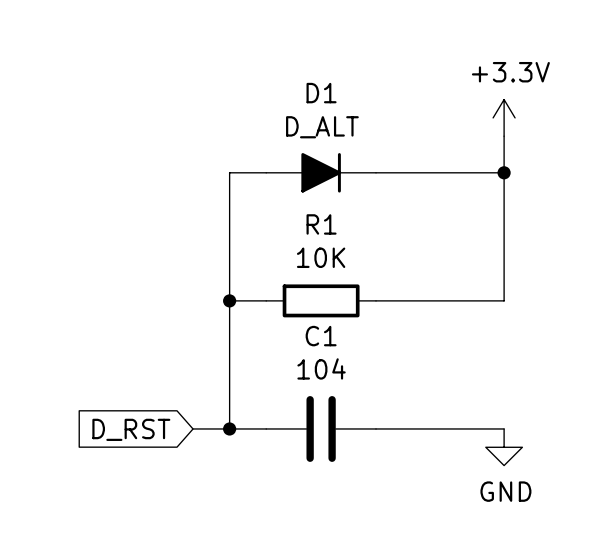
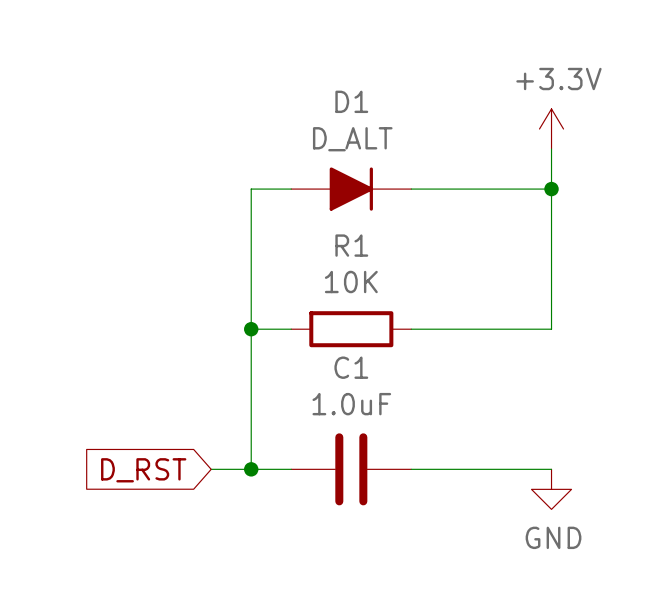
C1 value: 104 (321, 368) -> 1.0uF (351, 404)

